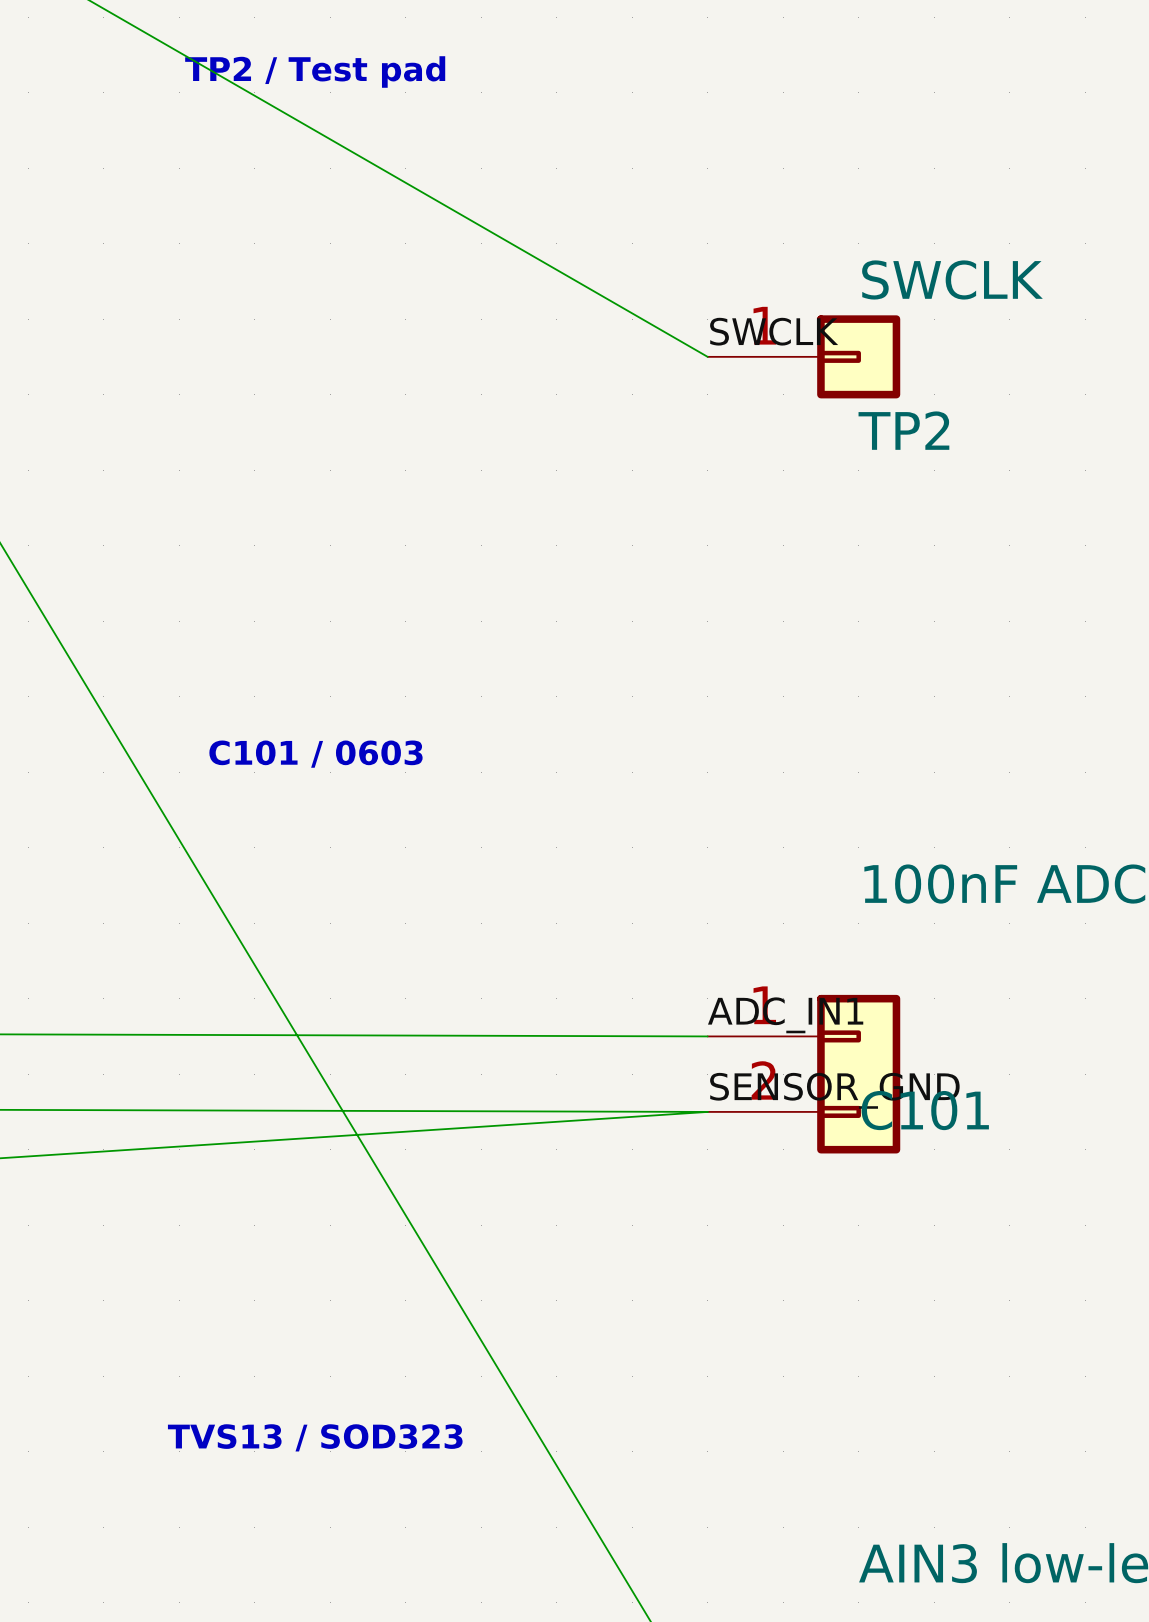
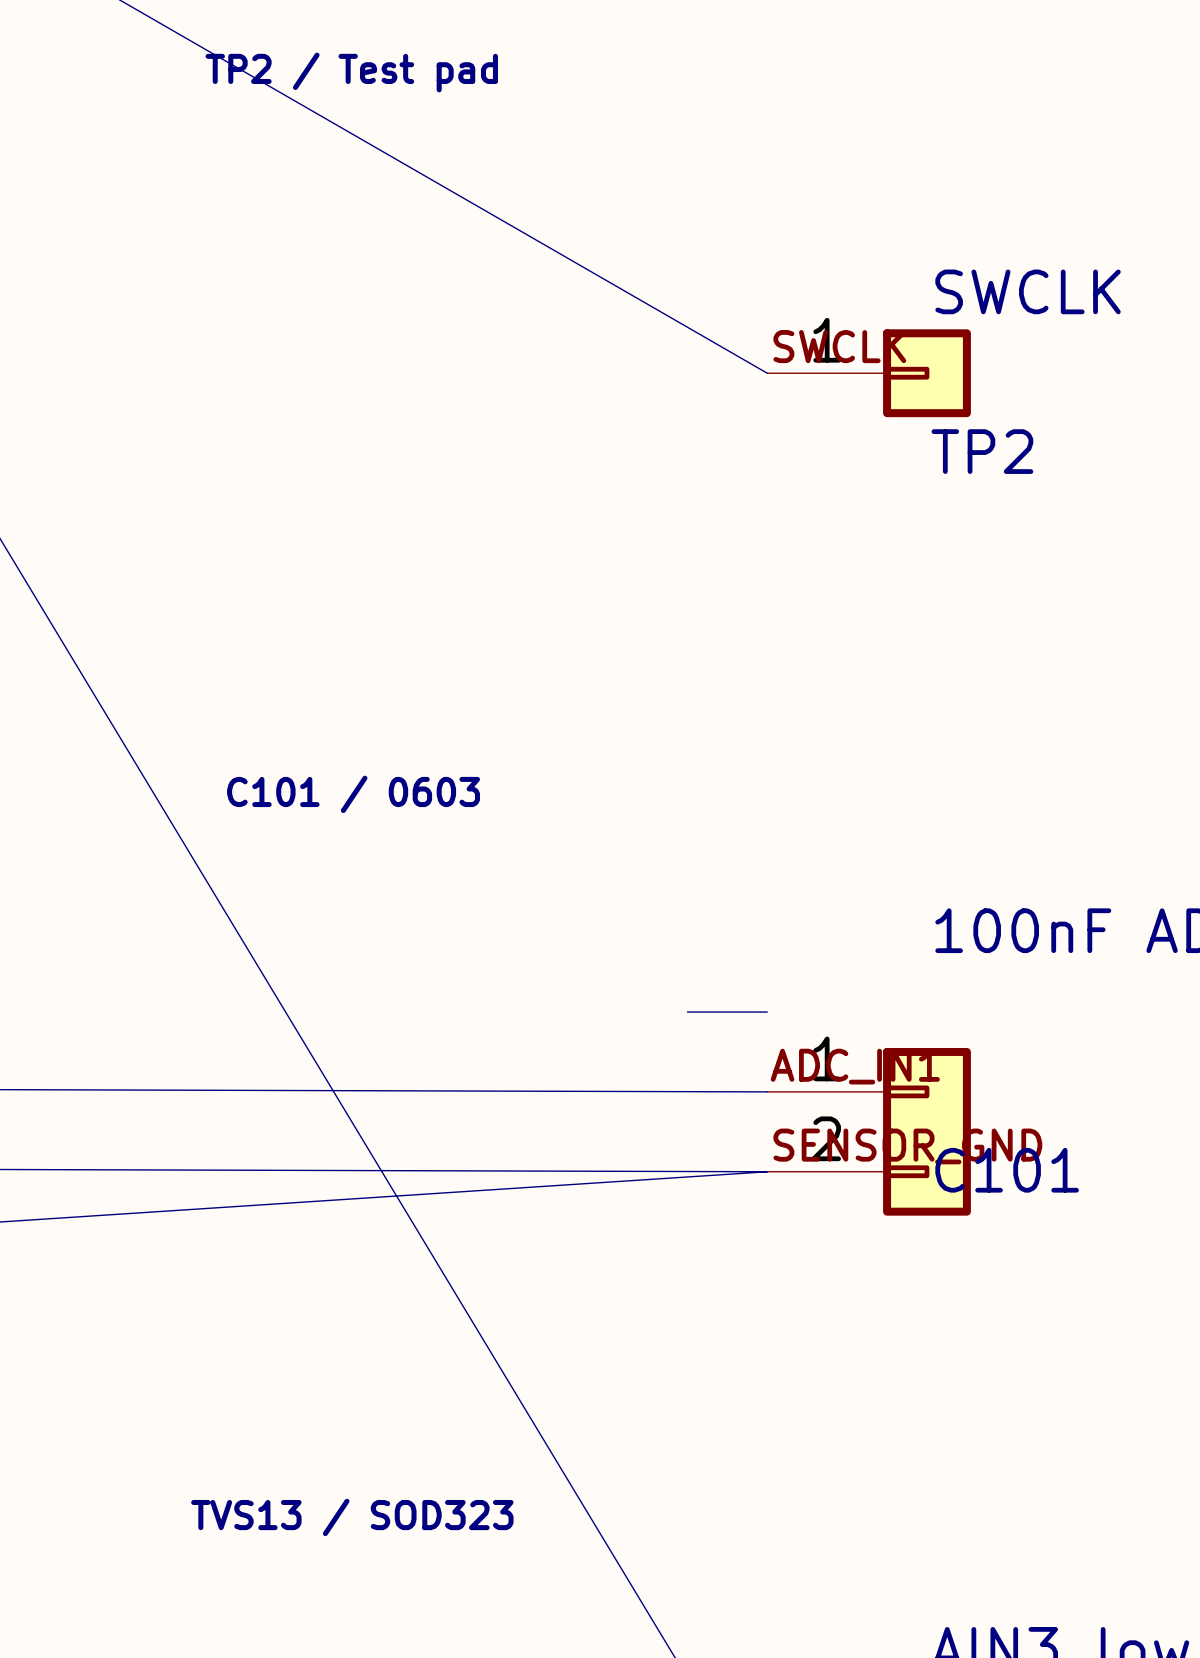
wire: none -> (687, 1012) (767, 1012)

